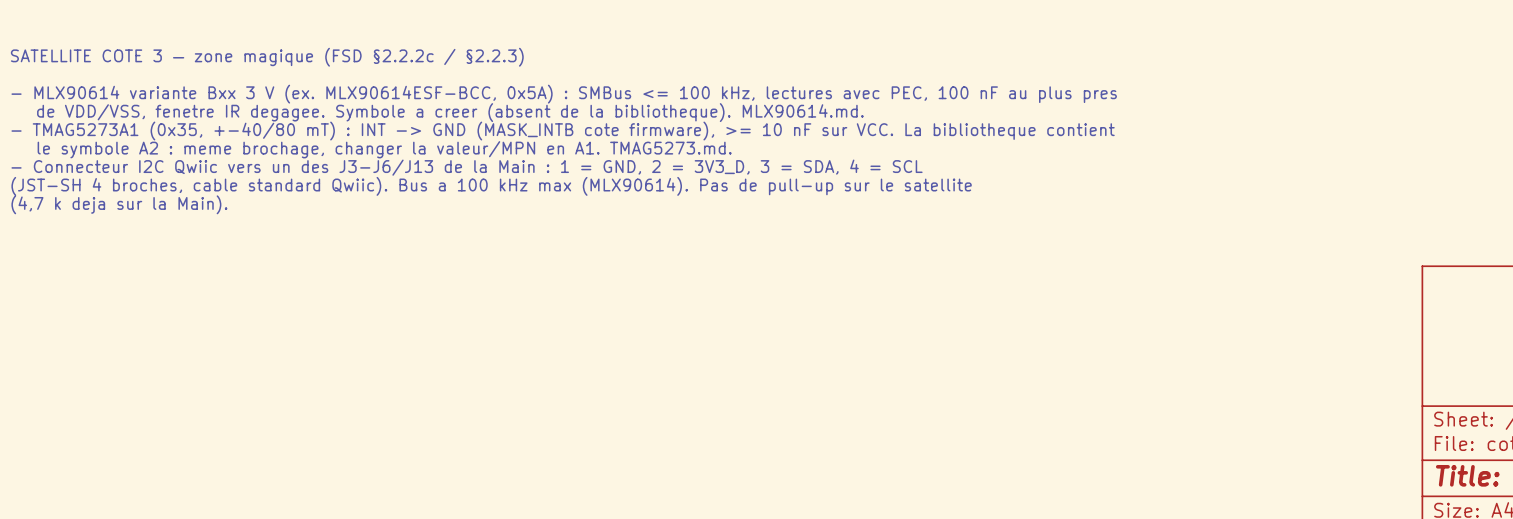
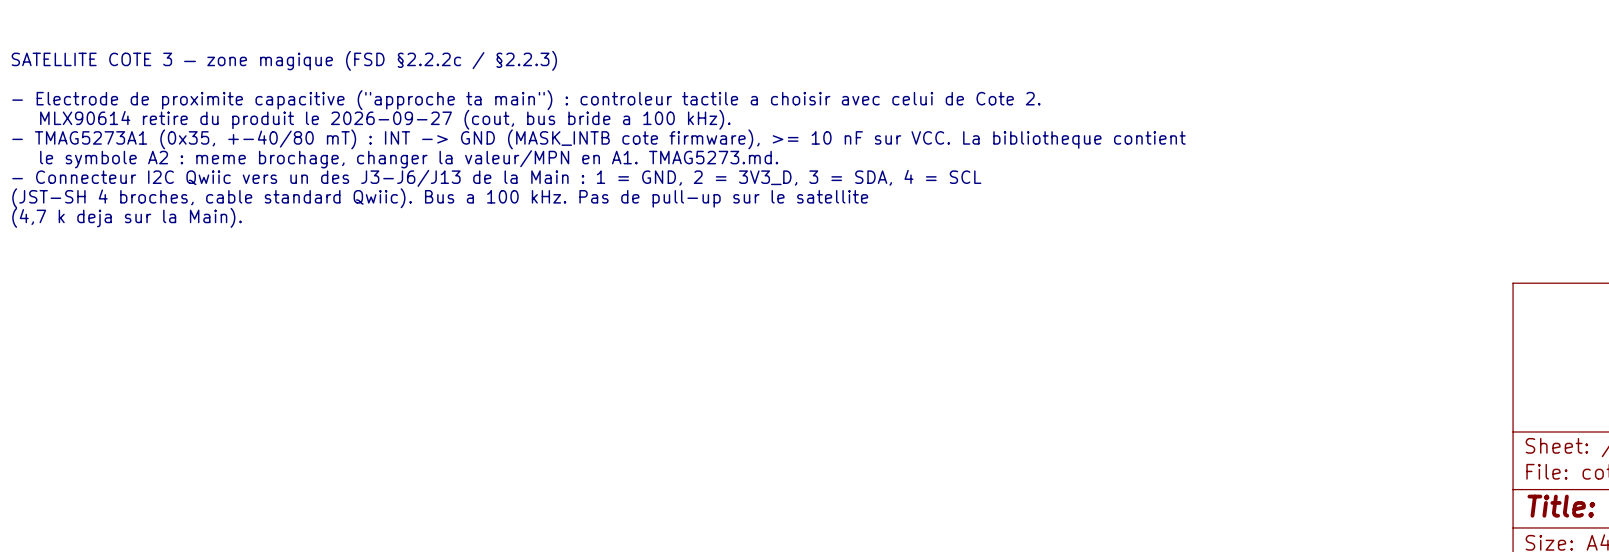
text: - MLX90614 variante Bxx 3 V (ex. MLX90614ESF-BCC, 0x5A) : SMBus <= 100 kHz, lectures avec PEC, 100 nF au plus pres (564, 94) -> - Electrode de proximite capacitive ("approche ta main") : controleur tactile a choisir avec celui de Cote 2. (526, 100)
text: de VDD/VSS, fenetre IR degagee. Symbole a creer (absent de la bibliotheque). MLX90614.md. (450, 112) -> MLX90614 retire du produit le 2026-09-27 (cout, bus bride a 100 kHz). (385, 119)
text: (JST-SH 4 broches, cable standard Qwiic). Bus a 100 kHz max (MLX90614). Pas de pull-up sur le satellite (491, 186) -> (JST-SH 4 broches, cable standard Qwiic). Bus a 100 kHz. Pas de pull-up sur le satellite (440, 198)

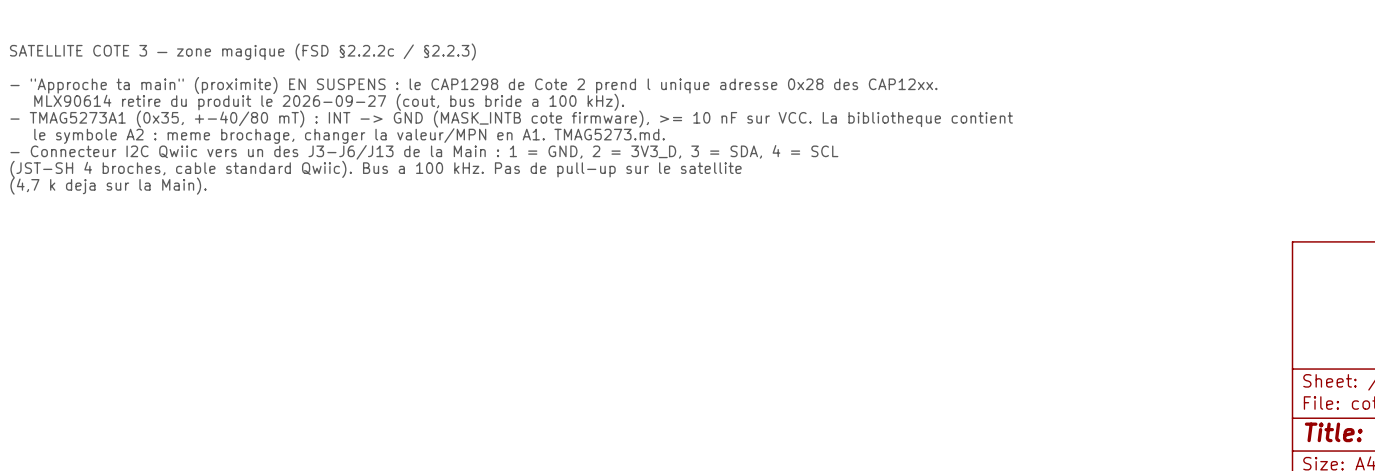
text: - Electrode de proximite capacitive ("approche ta main") : controleur tactile a choisir avec celui de Cote 2. (526, 100) -> - "Approche ta main" (proximite) EN SUSPENS : le CAP1298 de Cote 2 prend l unique adresse 0x28 des CAP12xx. (473, 85)

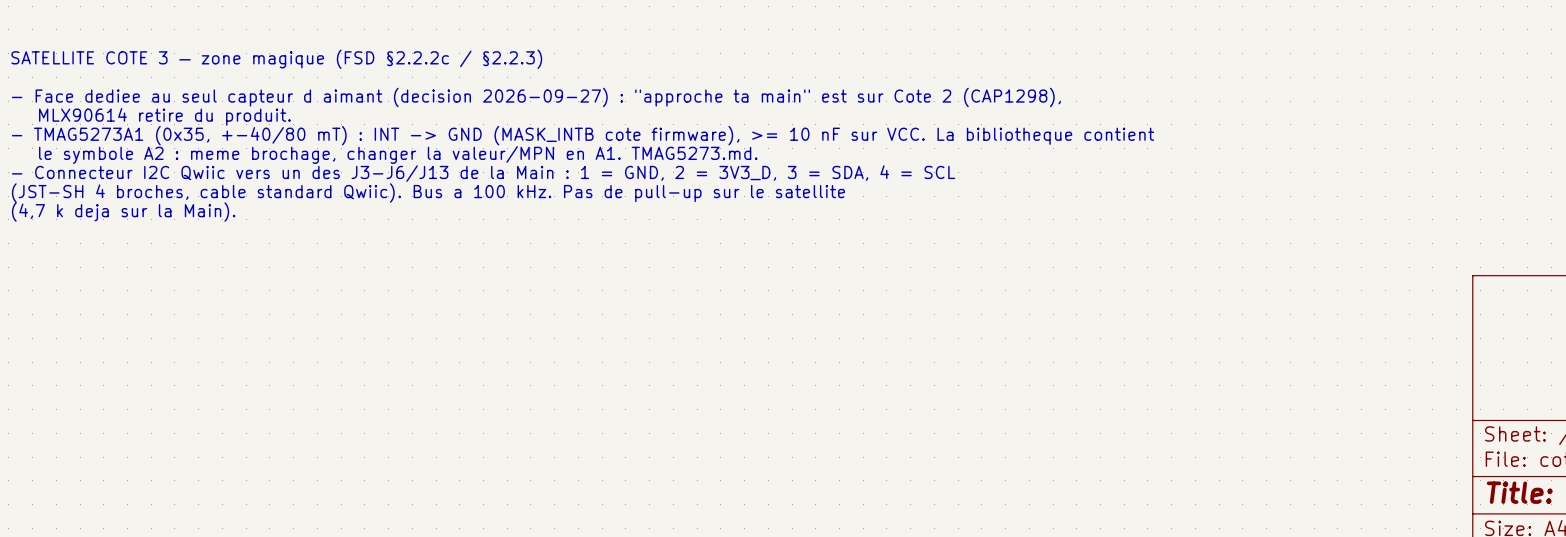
text: - "Approche ta main" (proximite) EN SUSPENS : le CAP1298 de Cote 2 prend l unique adresse 0x28 des CAP12xx. (473, 85) -> - Face dediee au seul capteur d aimant (decision 2026-09-27) : "approche ta main" est sur Cote 2 (CAP1298), (536, 97)
text: MLX90614 retire du produit le 2026-09-27 (cout, bus bride a 100 kHz). (329, 102) -> MLX90614 retire du produit. (164, 116)

